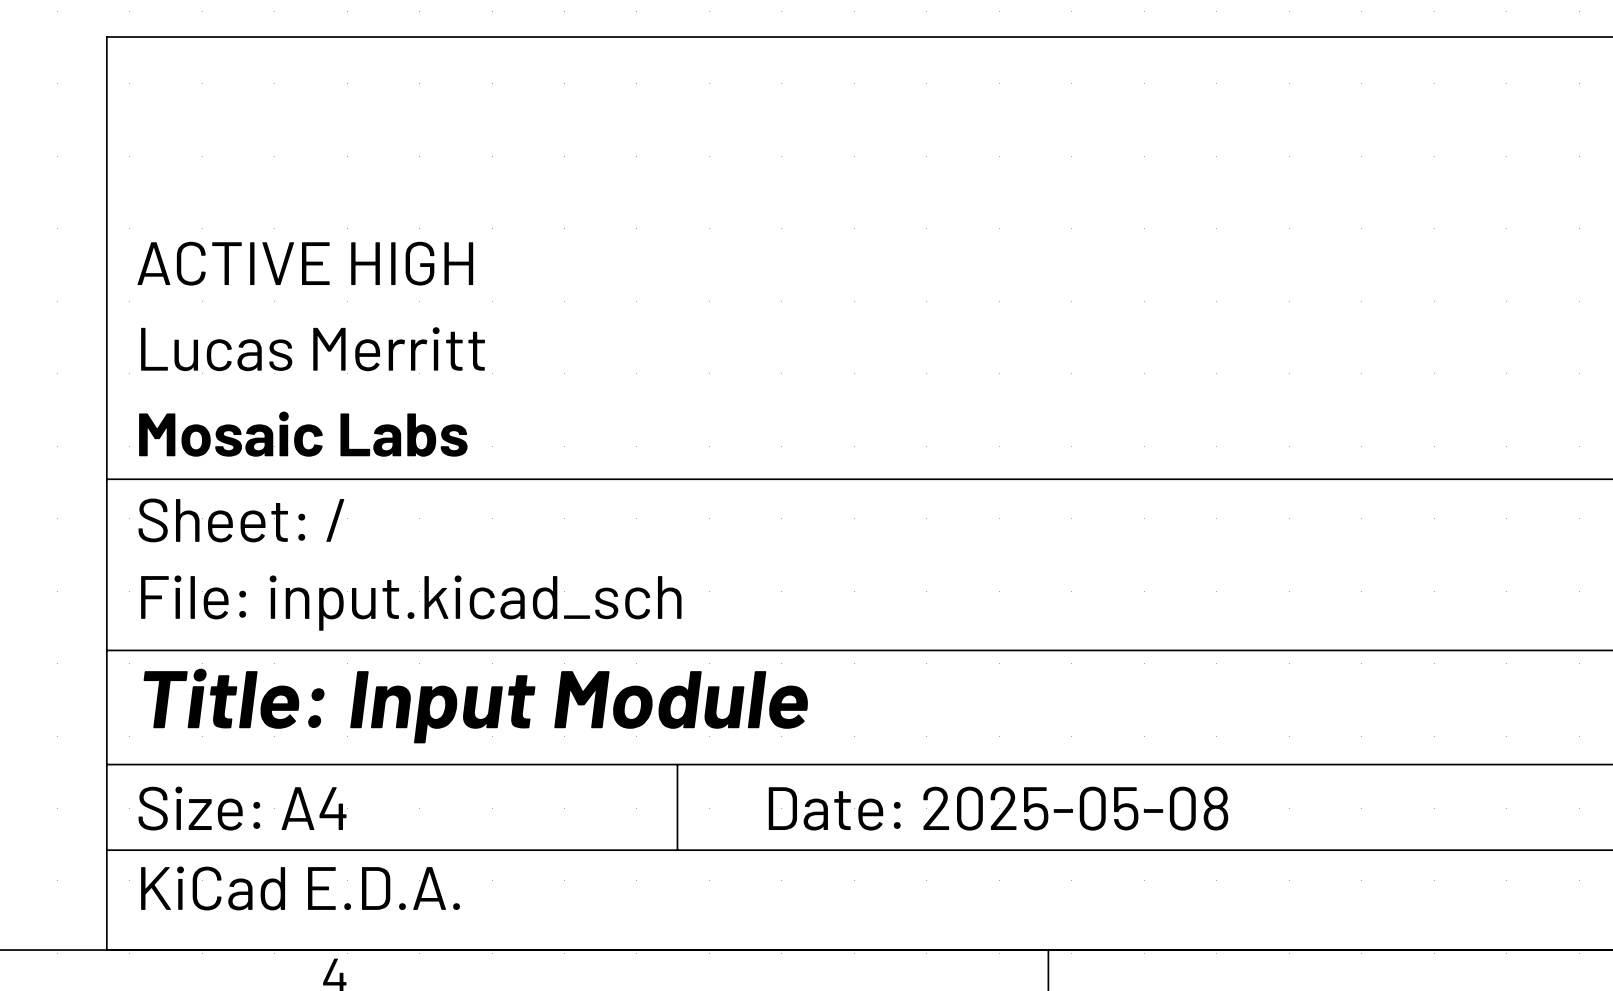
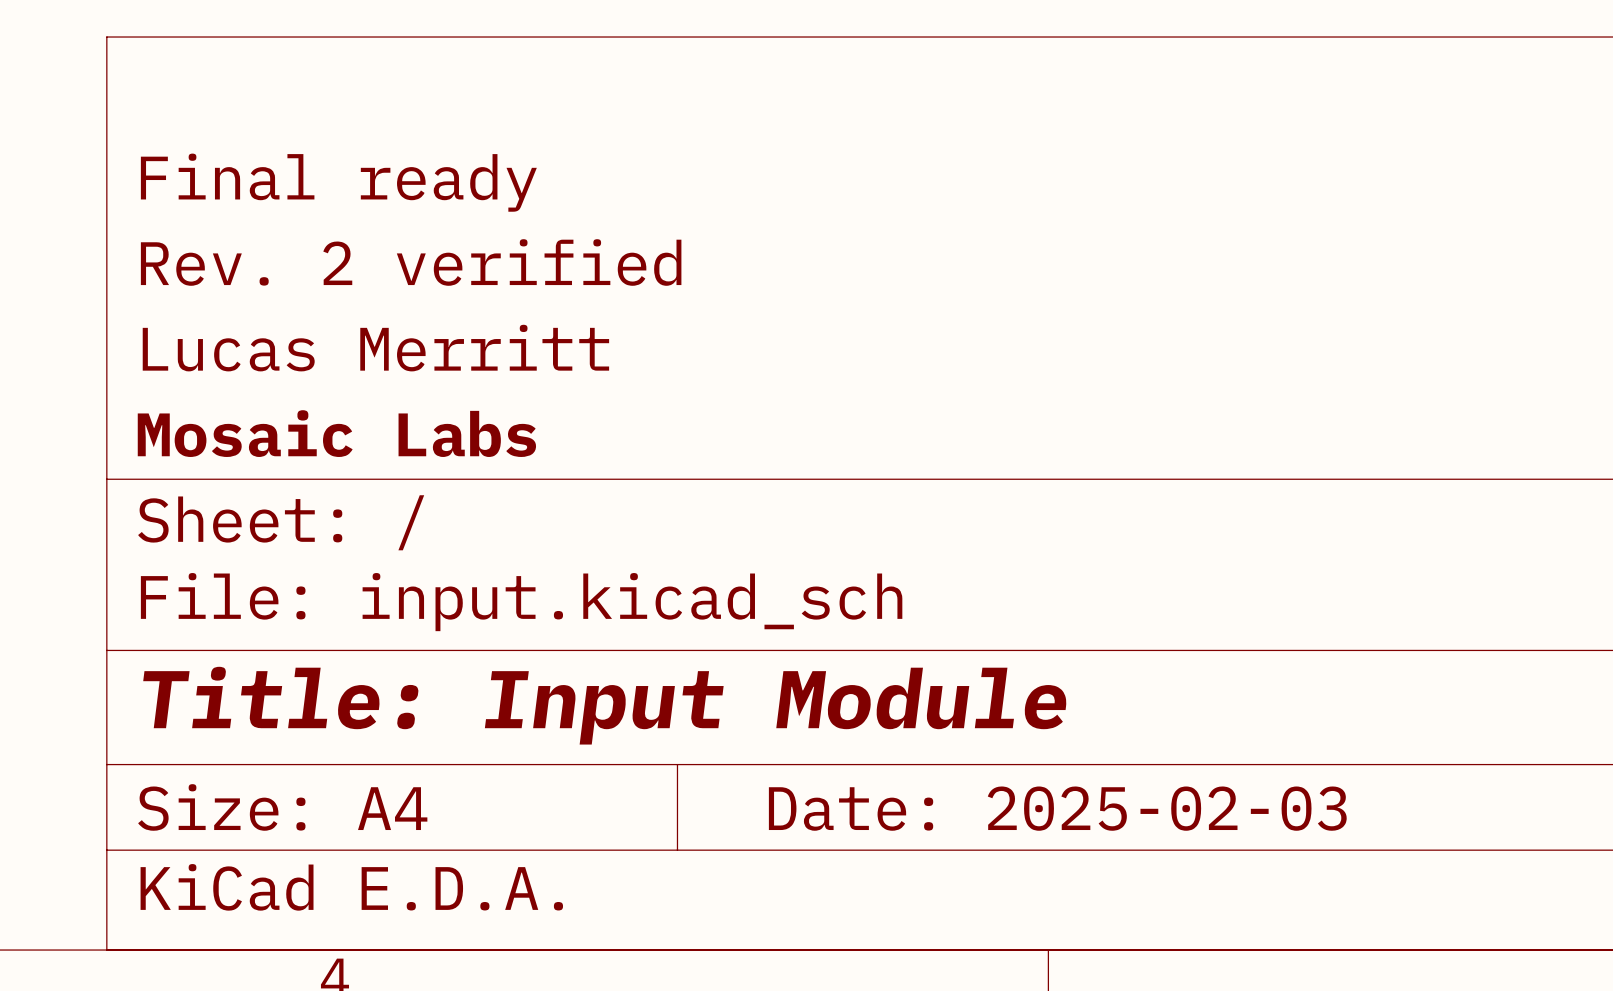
title block: none -> Final ready (338, 182)
title block: ACTIVE HIGH (305, 263) -> Rev. 2 verified (411, 262)
title block: Date: 2025-05-08 (998, 808) -> Date: 2025-02-03 (1057, 808)

